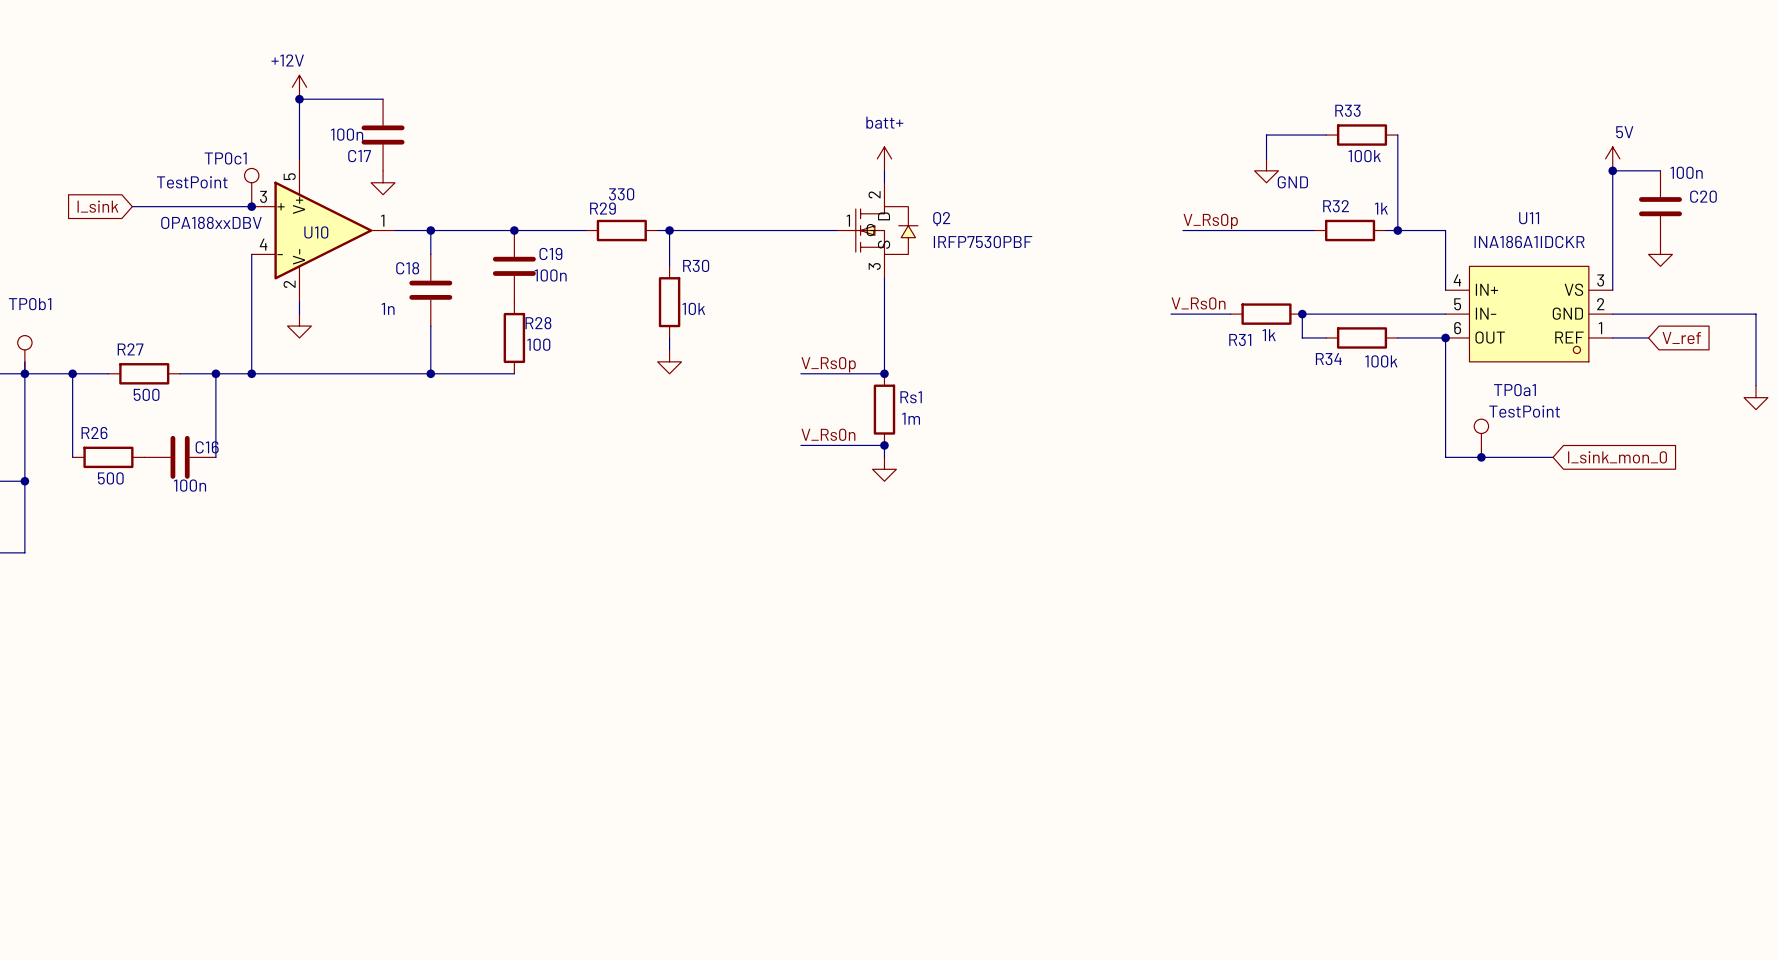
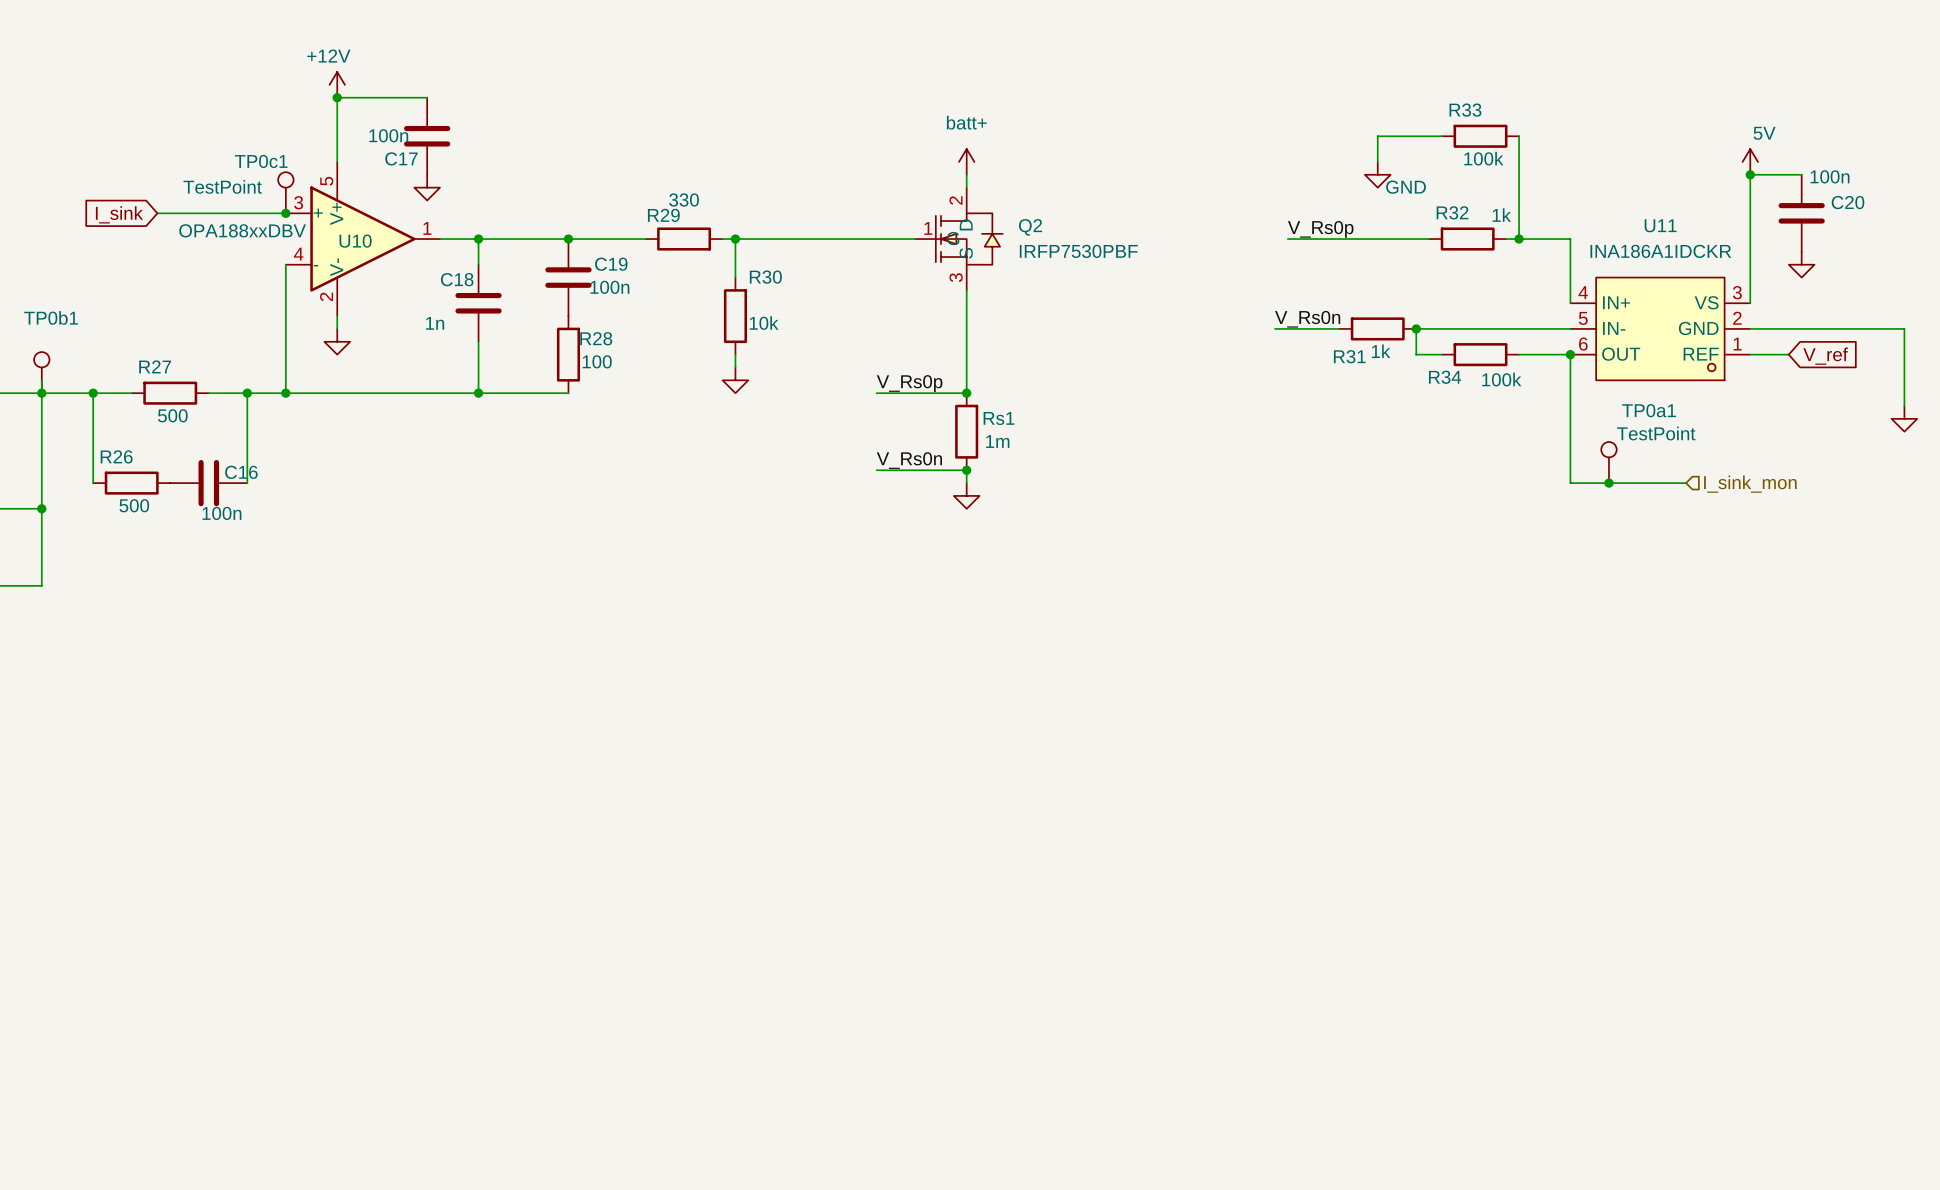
hierarchical label: none -> I_sink_mon (1750, 484)
global label: I_sink_mon_0 (1617, 457) -> none

